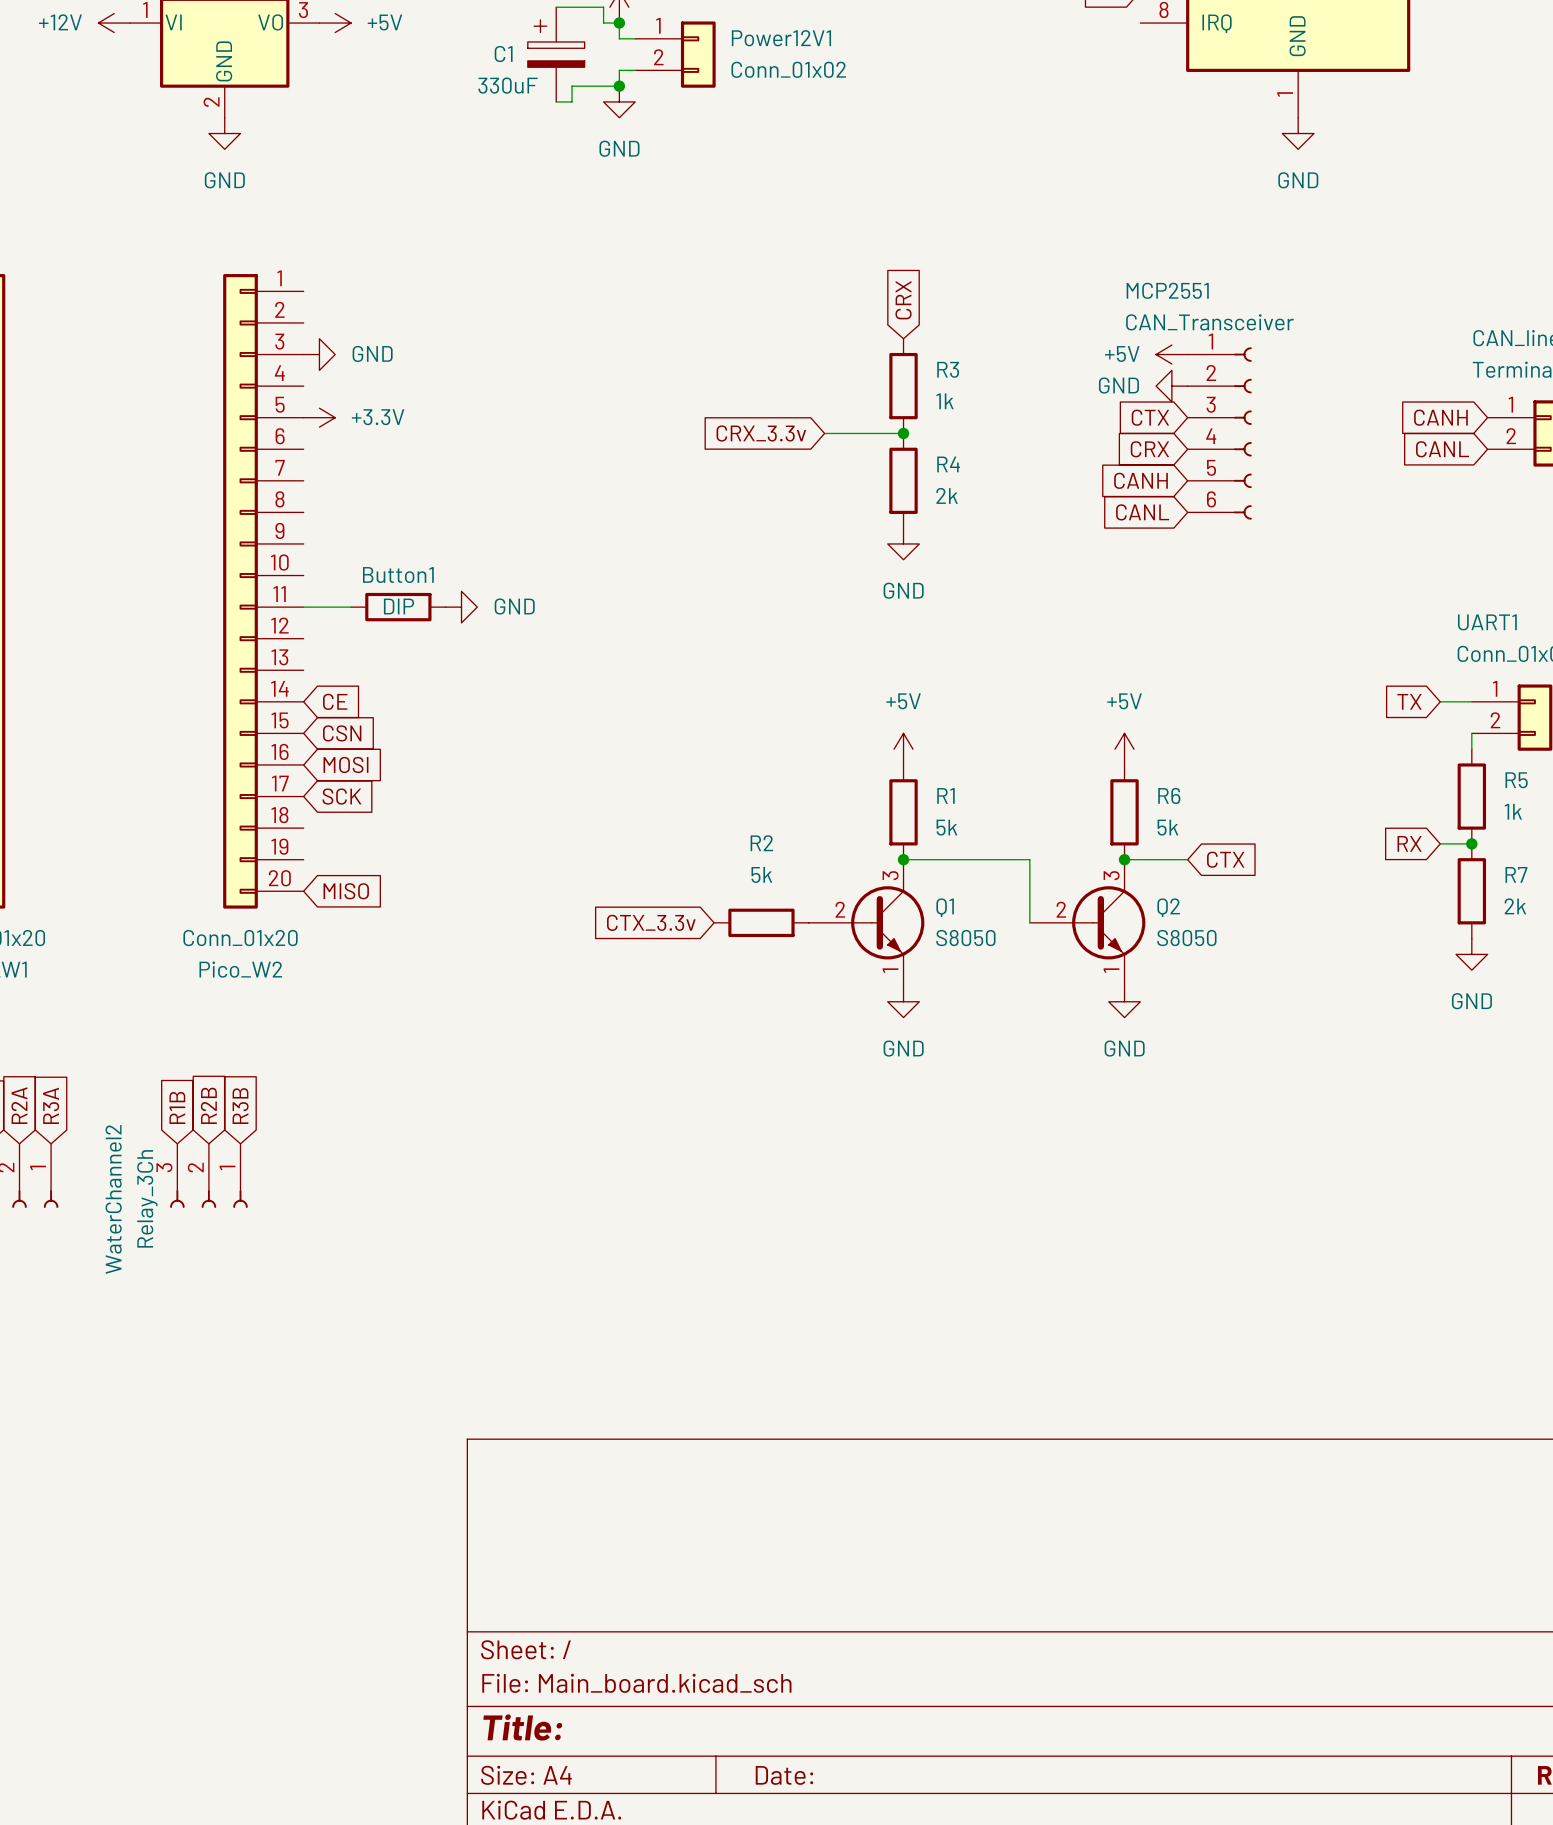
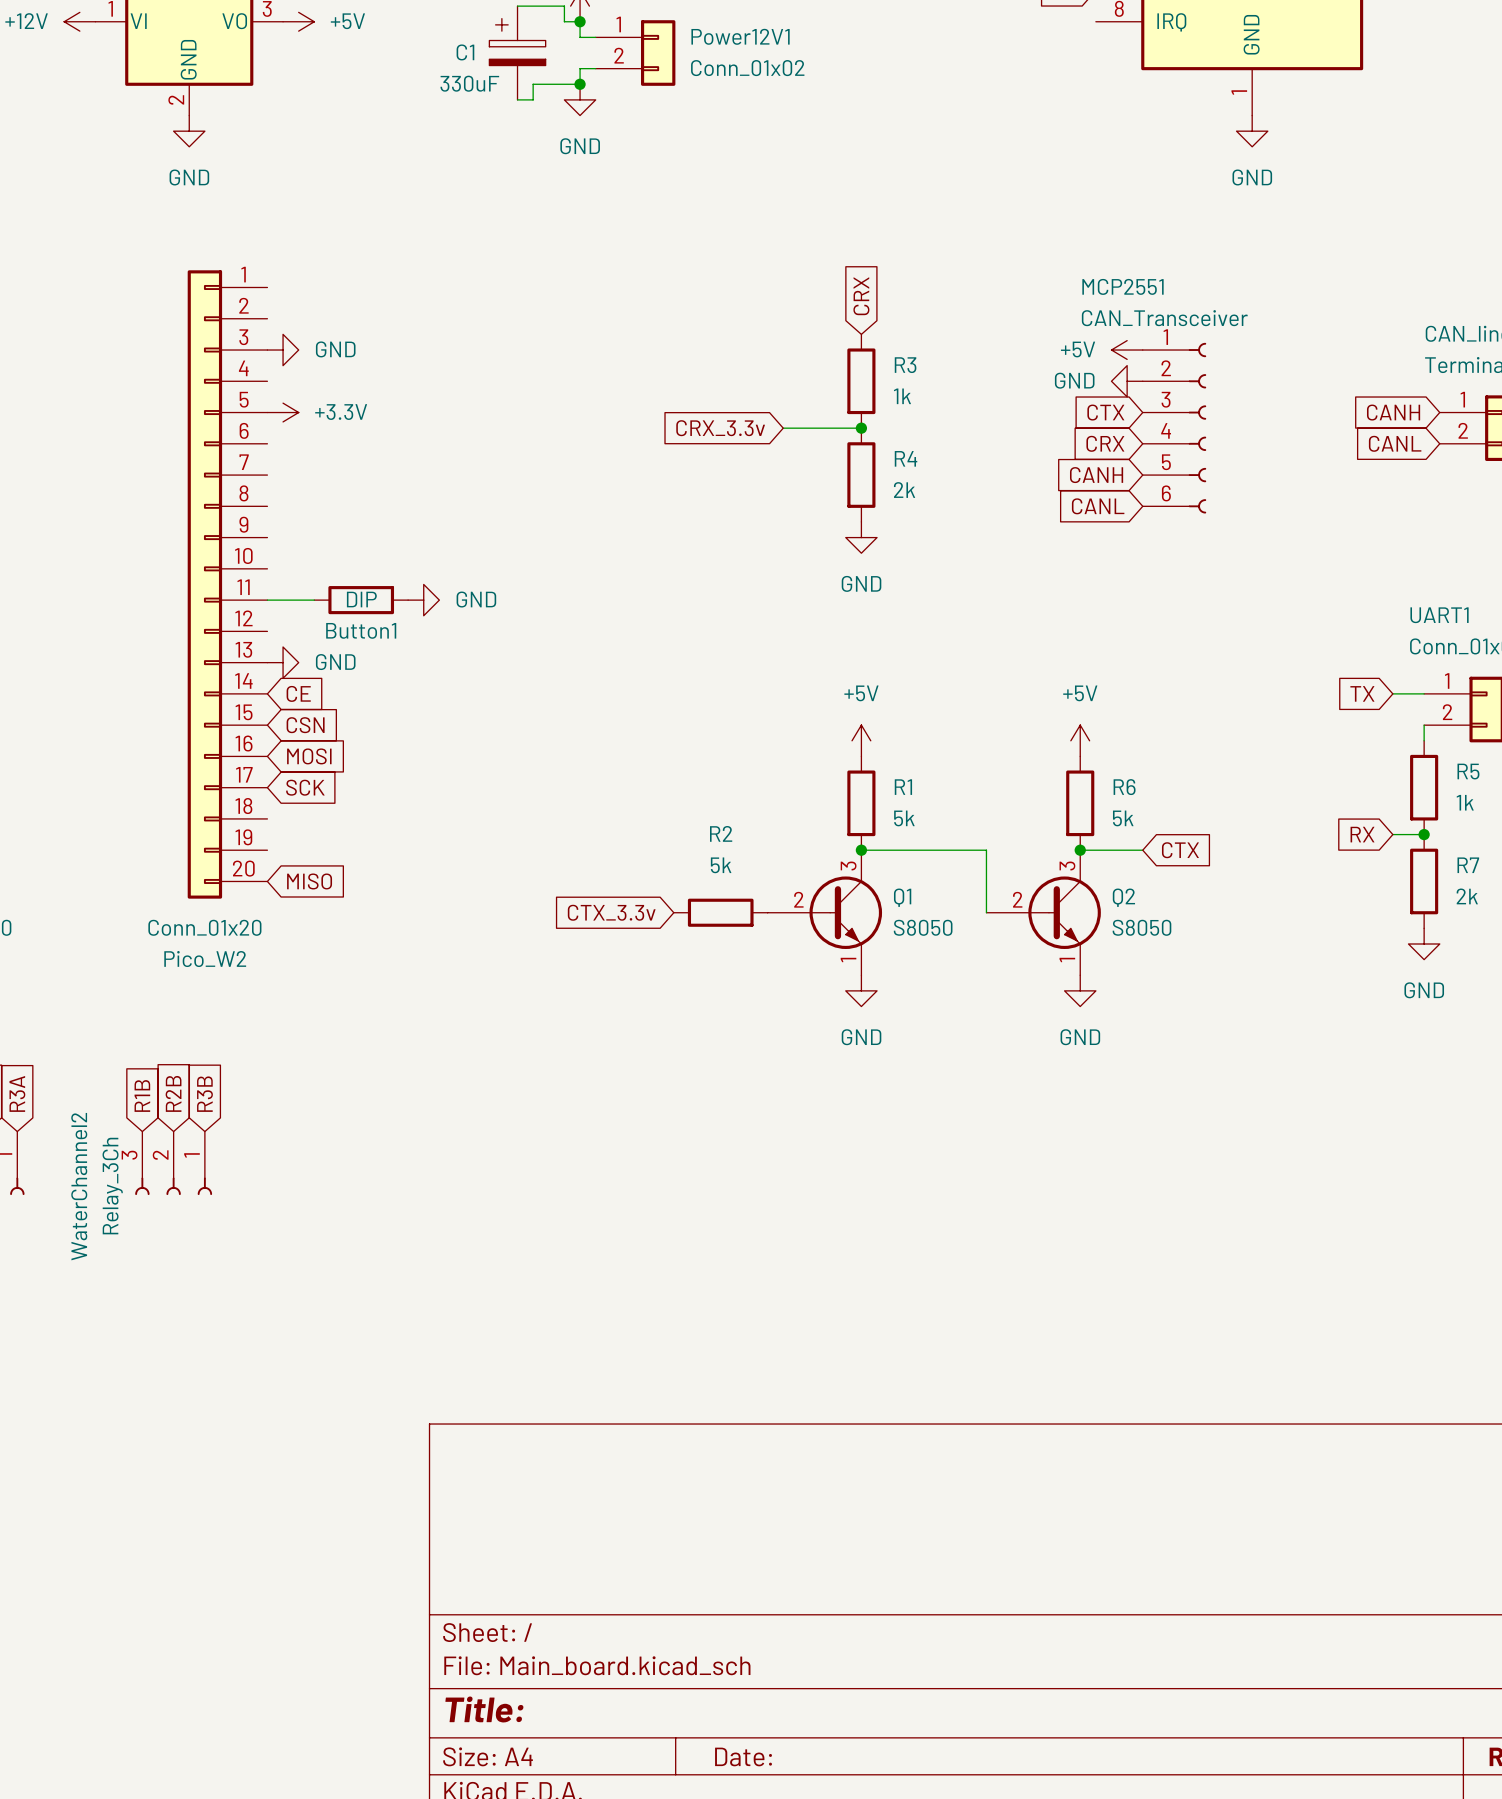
Button1 name position: Button1 (398, 575) -> Button1 (361, 630)
power symbol: none -> GND (283, 662)

